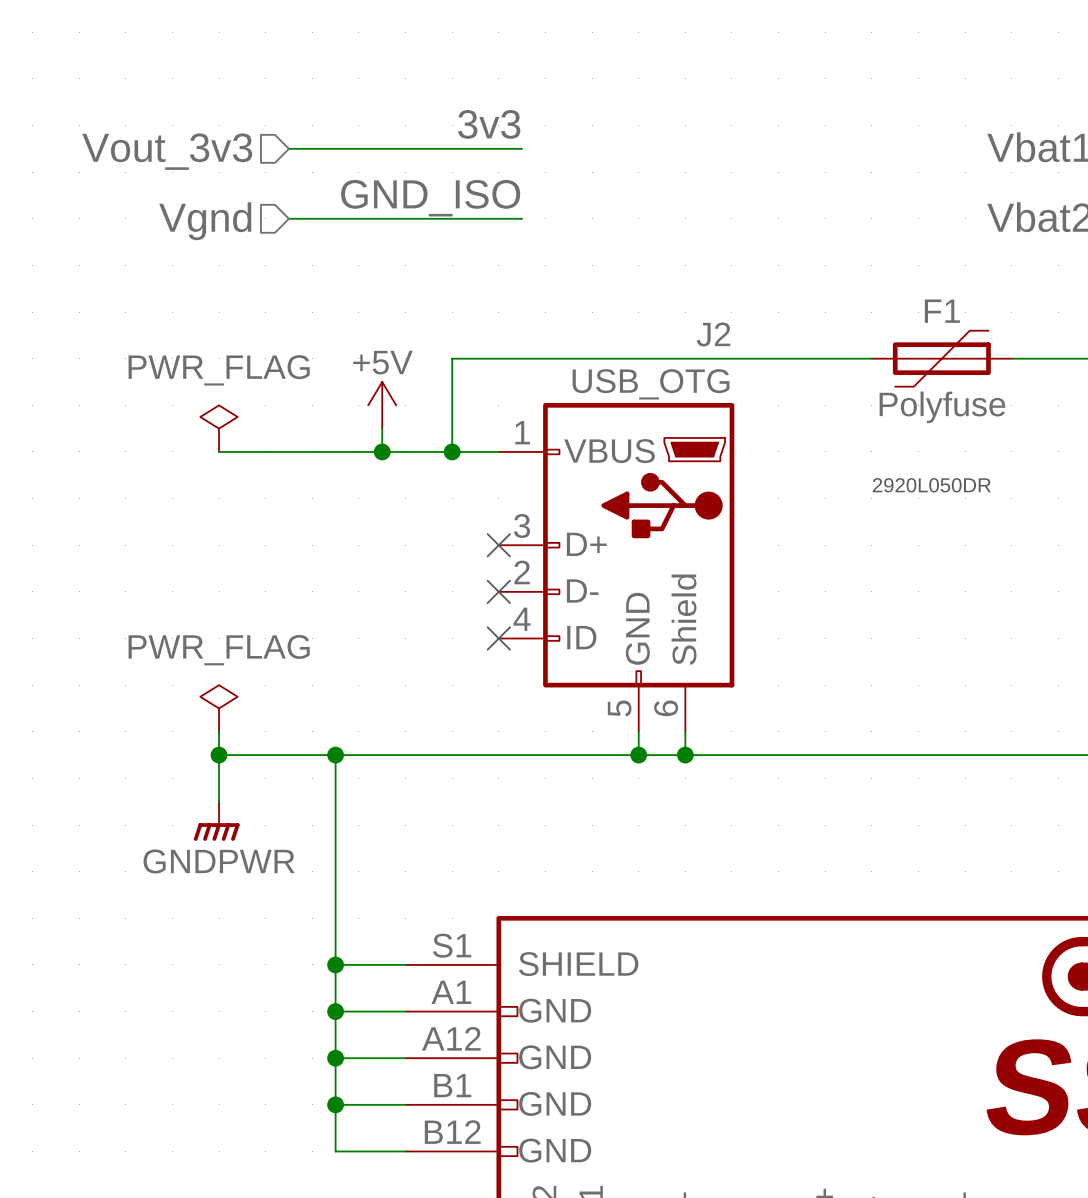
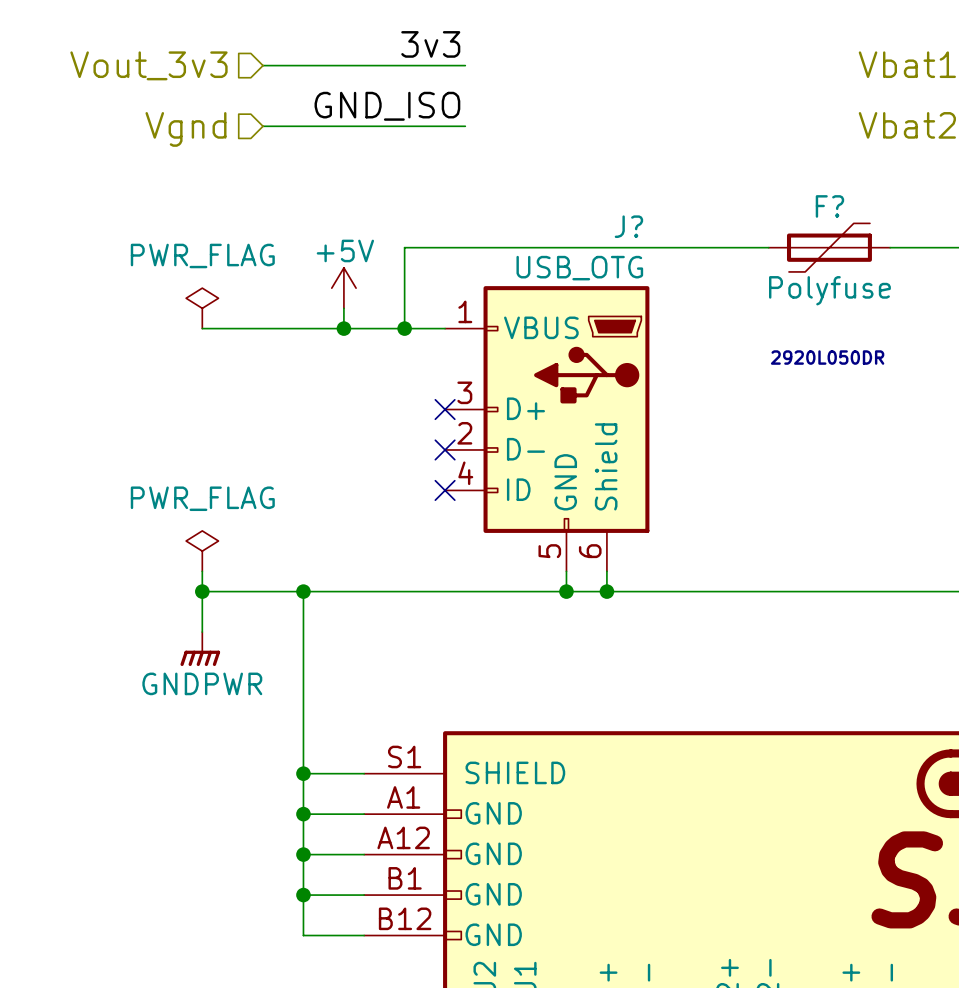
F1 name: F1 (942, 311) -> F? (829, 206)
J2 name: J2 (713, 334) -> J? (628, 226)

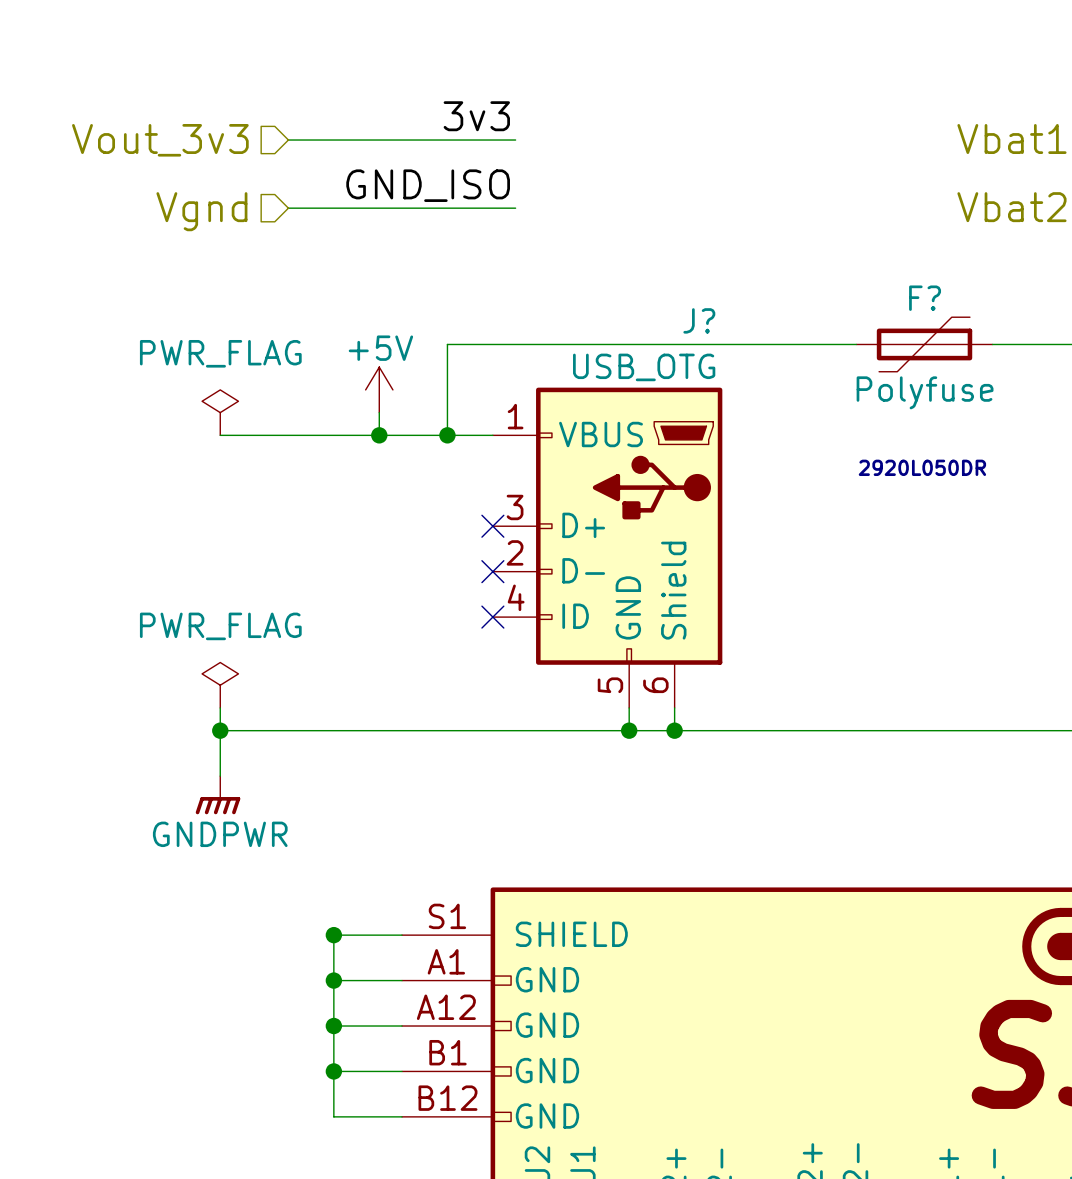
wire: (303, 591) (303, 773) -> none
junction: (303, 591) -> none

